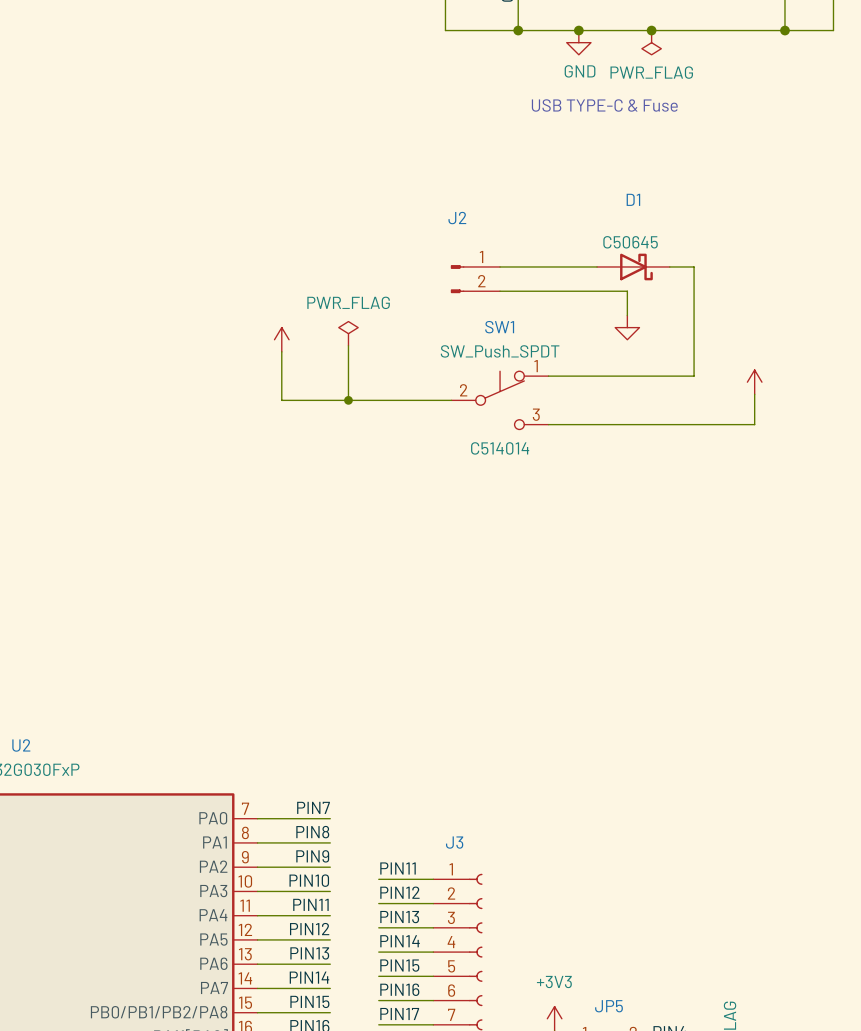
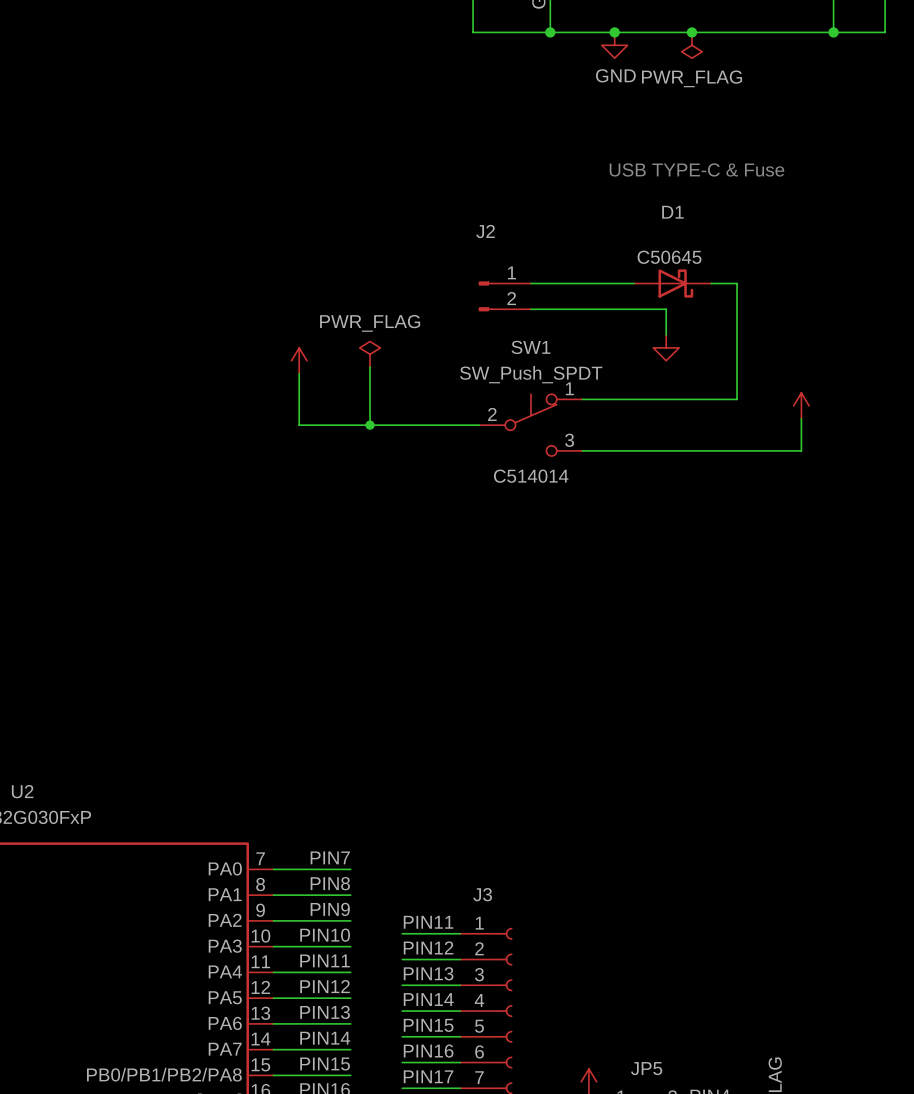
text position: USB TYPE-C & Fuse (604, 105) -> USB TYPE-C & Fuse (696, 169)
power symbol text: +3V3 (554, 982) -> none

